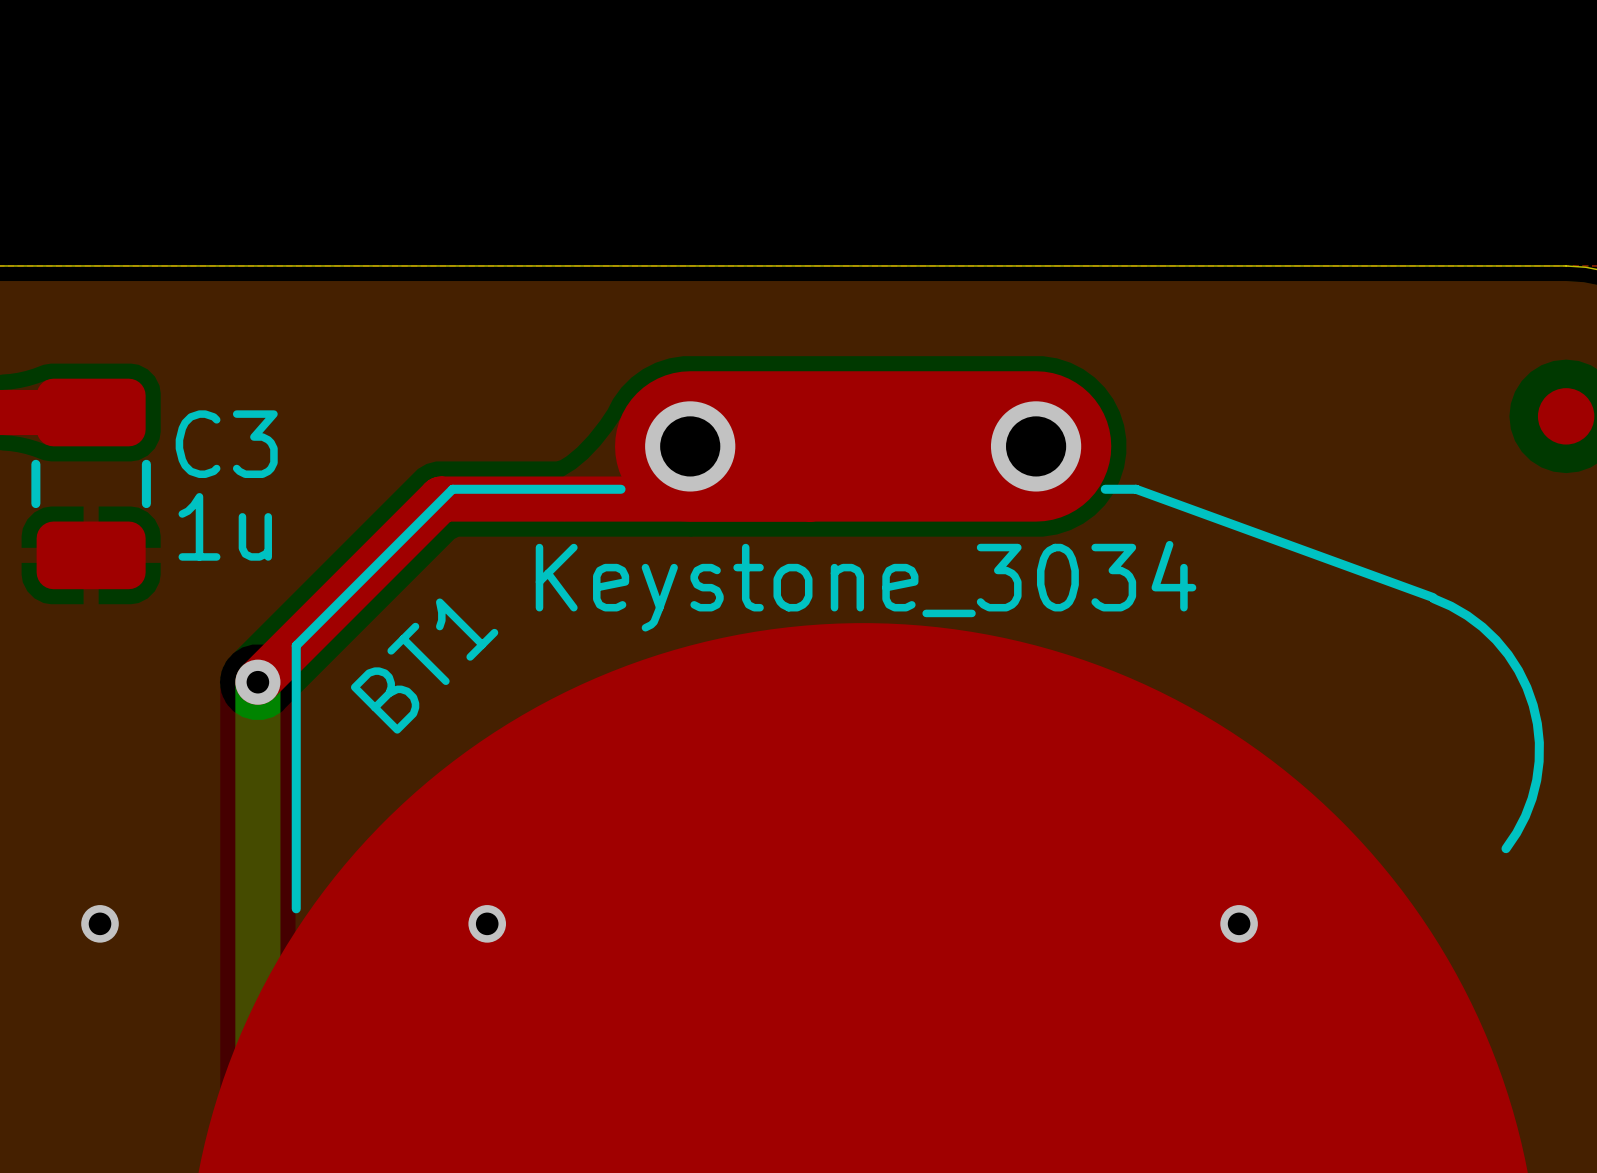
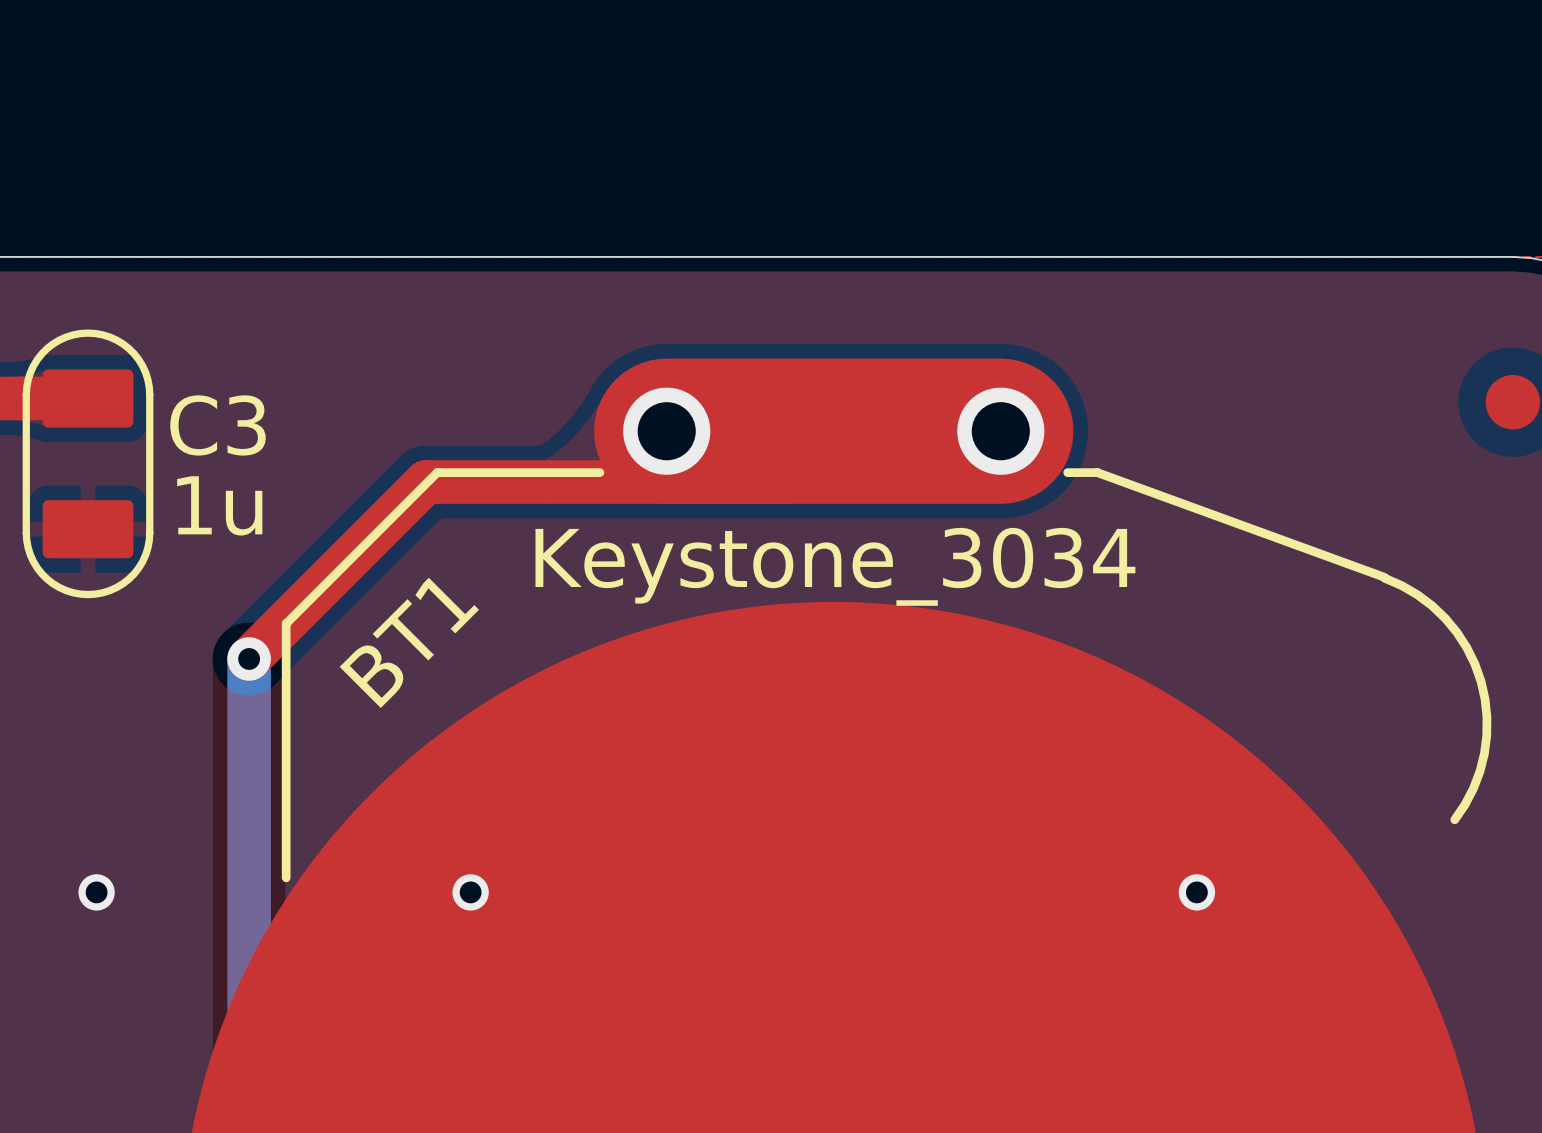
C3 footprint: [31, 378, 151, 590] -> [22, 329, 154, 599]

